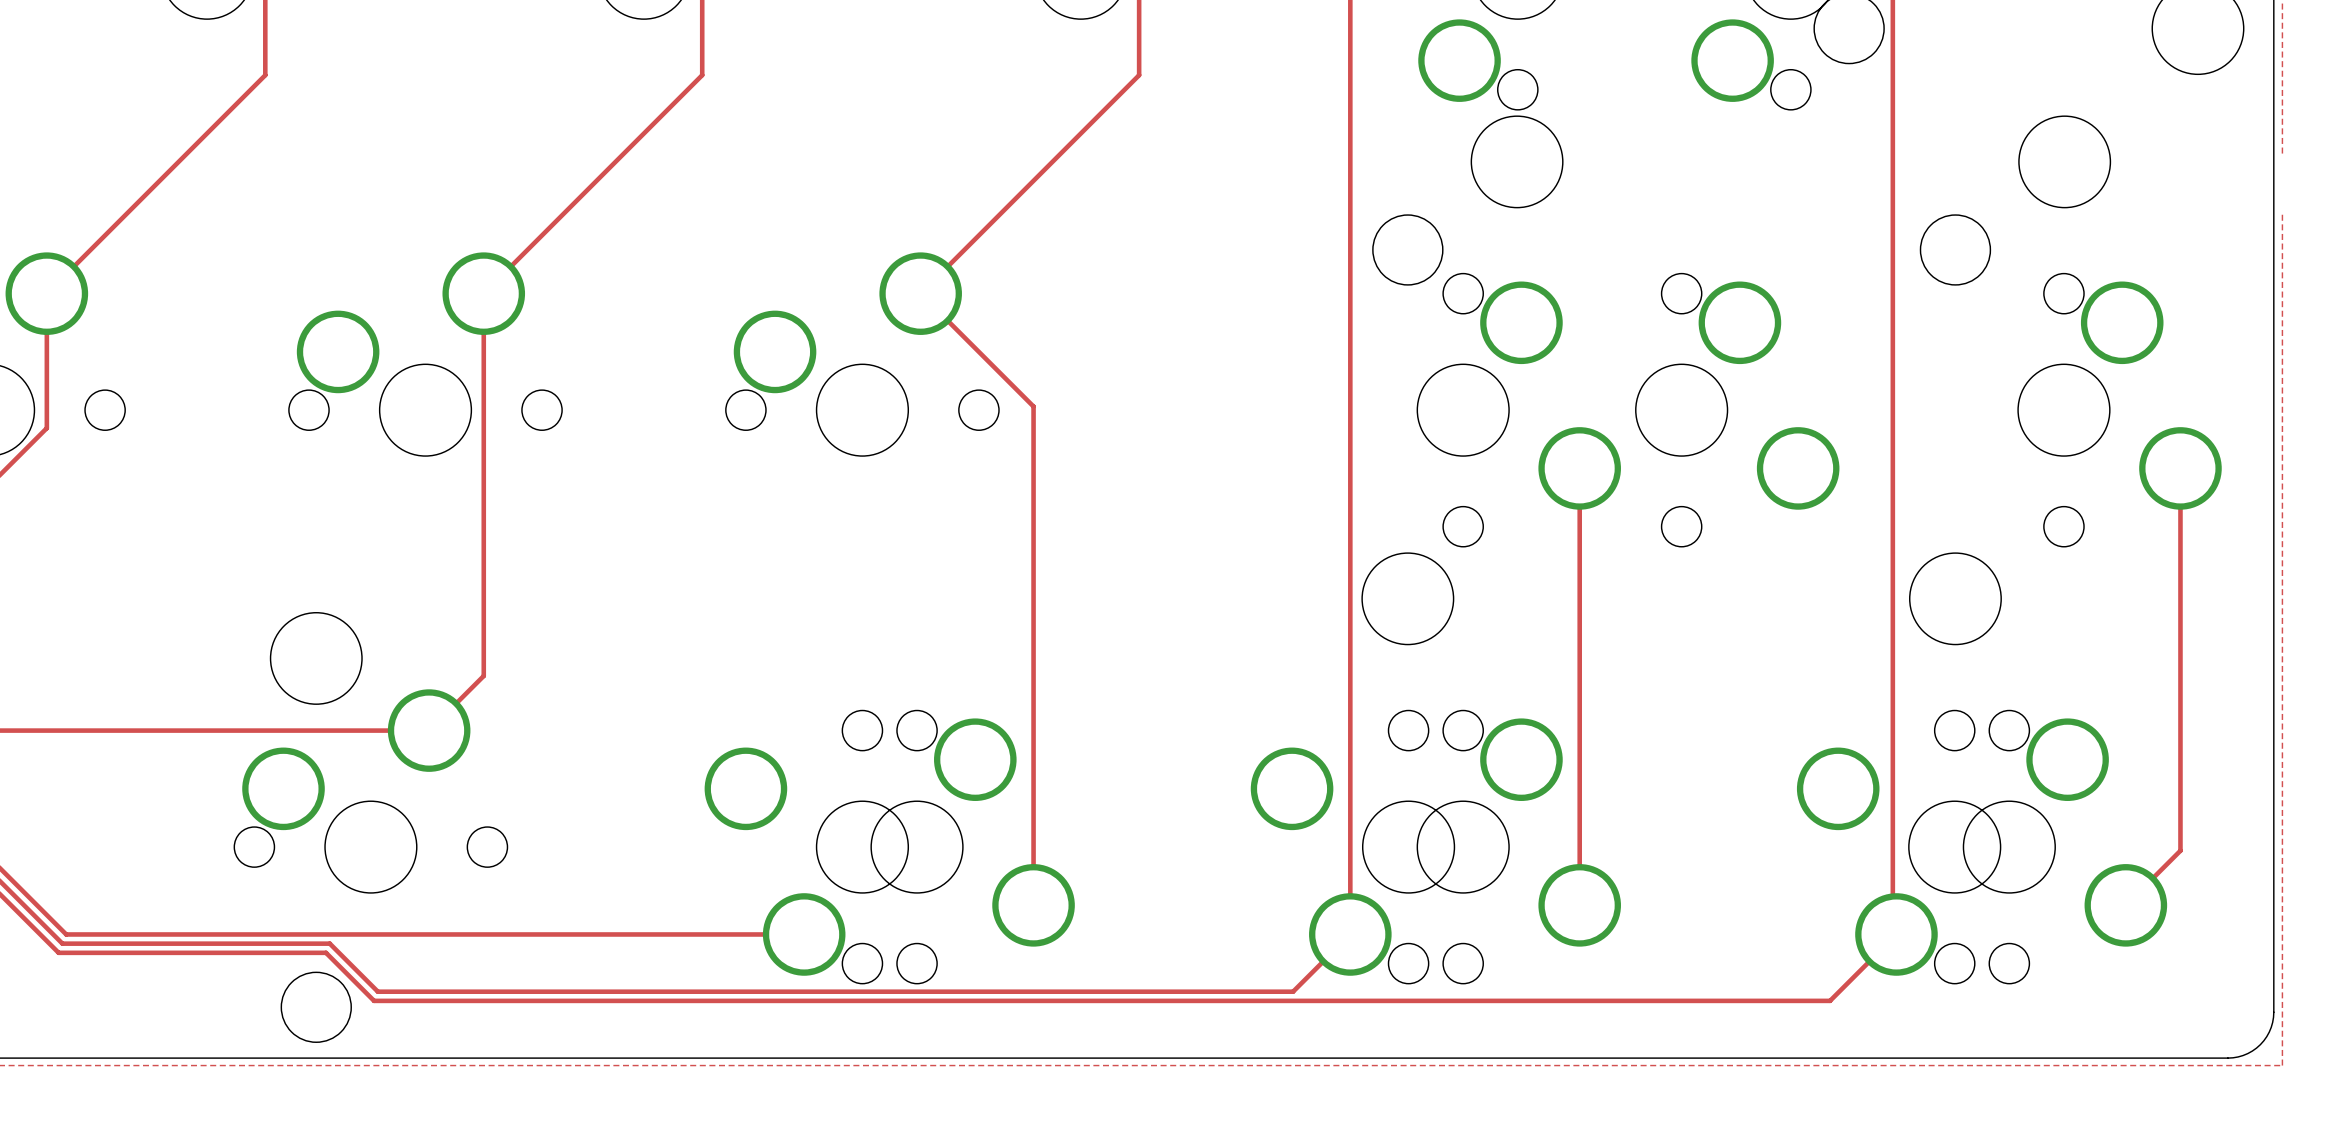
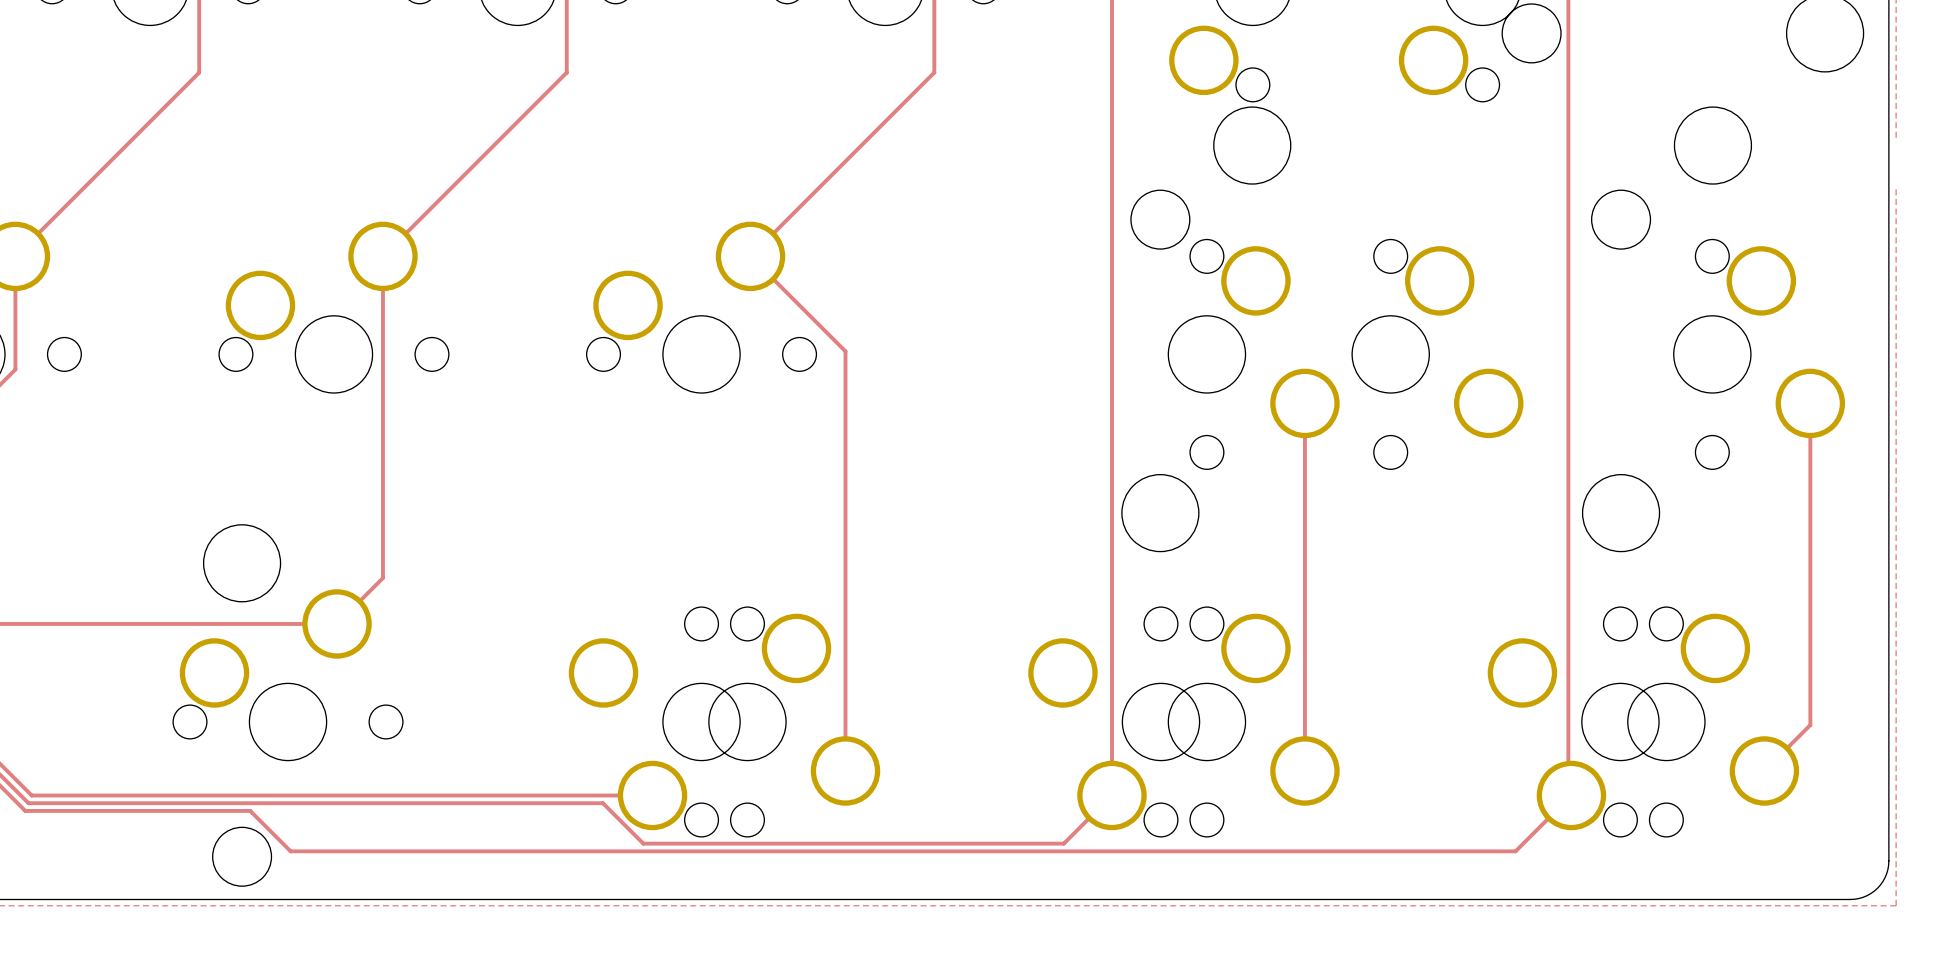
track: (329, 943) (377, 991) (793, 991) -> (253, 803) (602, 803) (643, 843)

